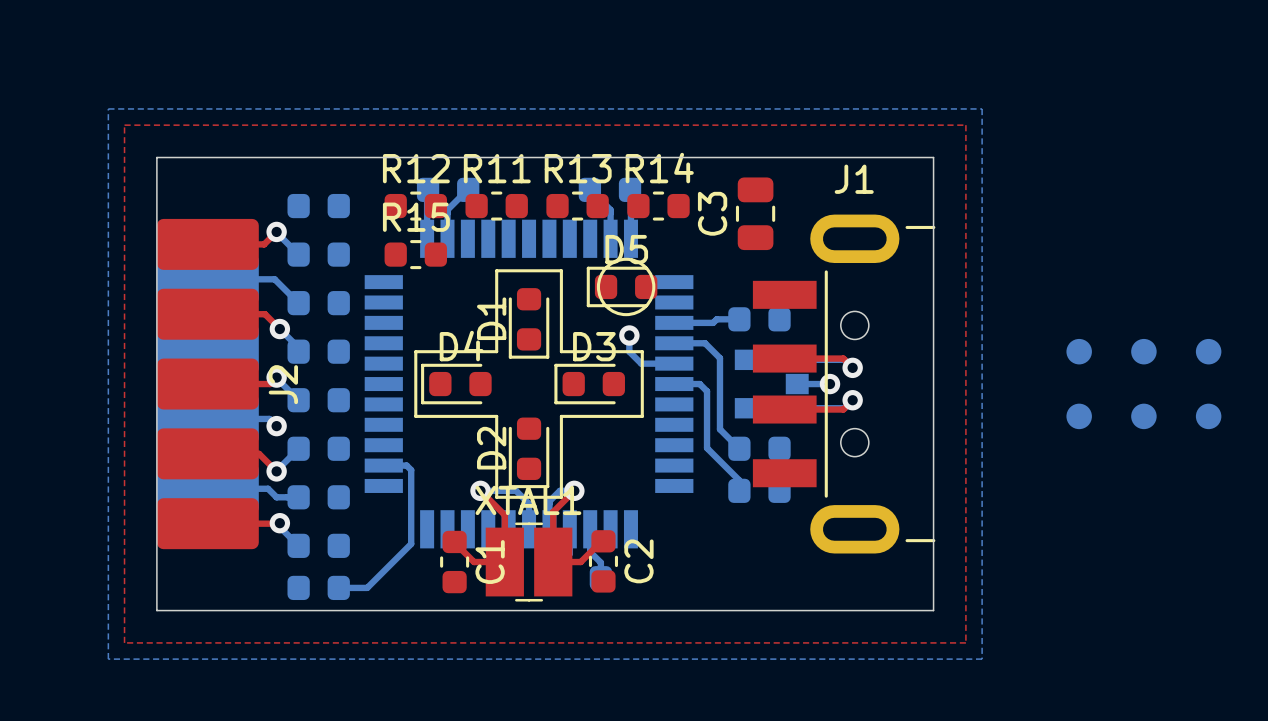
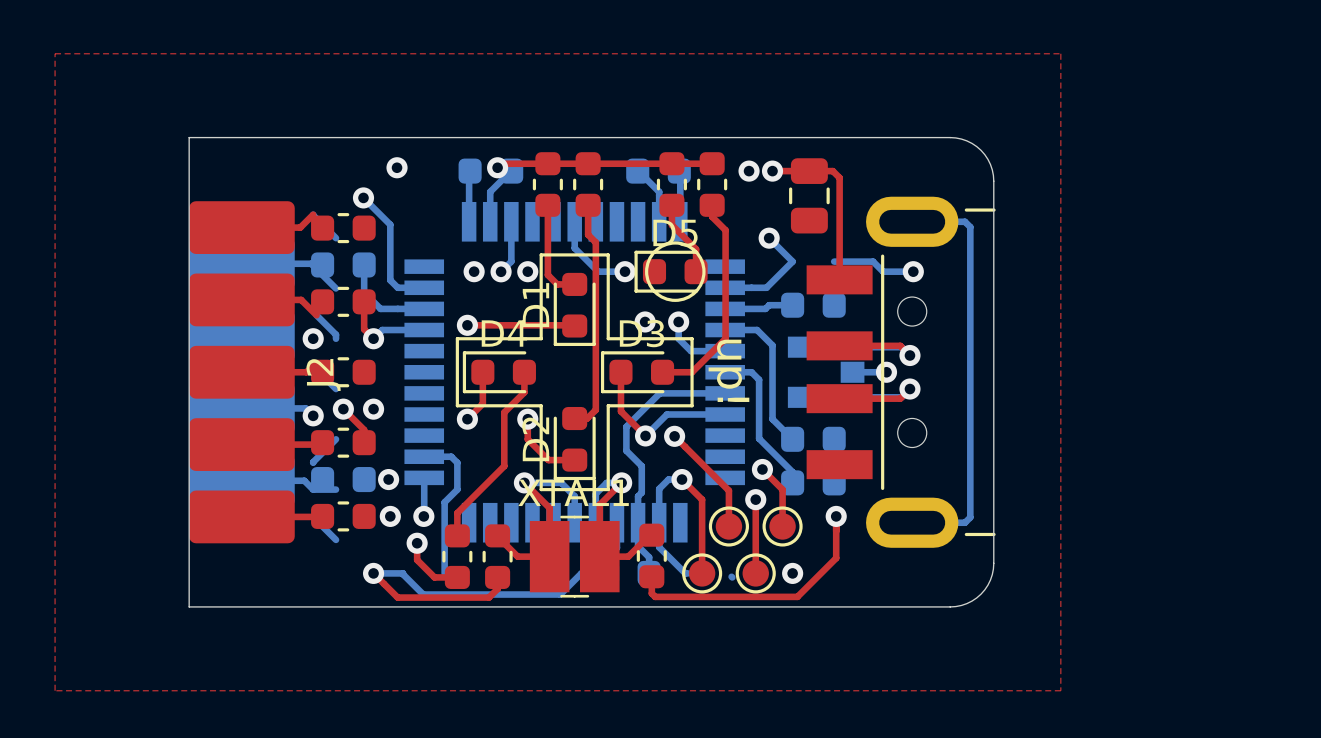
bottom zone outline: (108, 108) (108, 659) (982, 659) (982, 108) (108, 108) -> none
top zone outline: (124, 125) (124, 642) (965, 642) (965, 125) (124, 125) -> (55, 53) (55, 690) (1060, 690) (1060, 53) (55, 53)
board edge: (891, 157) (933, 157) (933, 199) -> (950, 137) (966, 140) (981, 150) (990, 164) (993, 181)
J1 name: J1 (854, 179) -> none
top track: none -> (712, 163) (501, 163) (497, 167)
via: none -> (397, 167)
via: none -> (497, 167)
via: none -> (749, 171)
top track: none -> (772, 171) (832, 171) (839, 177) (839, 279)
via: none -> (772, 171)
part: none -> (547, 184)
part: none -> (588, 184)
part: none -> (671, 184)
part: none -> (712, 184)
part: (318, 206) -> none
R12: (415, 206) -> none
R11: (496, 206) -> none
R13: (577, 206) -> none
R14: (658, 206) -> none
C3 name: C3 (712, 213) -> none
bottom track: none -> (363, 197) (390, 224) (390, 280) (397, 287) (424, 287)
via: none -> (363, 197)
top track: none -> (547, 205) (547, 275) (557, 284) (574, 284)
top track: none -> (671, 205) (671, 225) (696, 249) (696, 271)
top track: none -> (712, 205) (712, 216) (725, 230) (725, 338) (692, 372) (662, 372)
top track: none -> (588, 205) (588, 234) (595, 242) (595, 409) (587, 418) (574, 418)
via: (276, 231) -> none
bottom track: none -> (511, 221) (511, 261) (501, 271)
bottom track: none -> (574, 221) (574, 248) (598, 271) (625, 271)
bottom track: none -> (912, 221) (965, 221) (970, 227) (970, 517) (965, 522) (912, 522)
part side: bottom (318, 254) -> top (343, 228)
R15: (415, 254) -> none
bottom track: none -> (769, 238) (792, 261) (766, 287) (725, 287)
via: none -> (769, 238)
bottom track: none -> (834, 261) (873, 261) (883, 271) (913, 271)
bottom track: none -> (364, 264) (364, 292) (380, 308) (424, 308)
via: none -> (474, 271)
via: none -> (527, 271)
via: none -> (625, 271)
via: none -> (913, 271)
via: none -> (501, 271)
part position: (318, 303) -> (343, 264)
top track: none -> (364, 301) (364, 329) (373, 338)
via: (279, 329) -> none
via: none -> (645, 321)
top track: none -> (467, 325) (574, 325)
via: none -> (467, 325)
bottom track: none -> (424, 330) (382, 330) (373, 338)
via: none -> (313, 338)
part side: bottom (318, 351) -> top (343, 301)
via: none -> (373, 338)
part side: bottom (1079, 351) -> top (755, 573)
part side: bottom (1143, 351) -> top (728, 526)
part side: bottom (1208, 351) -> top (782, 526)
via: (276, 377) -> none
top track: none -> (482, 372) (482, 403) (467, 419)
top track: none -> (524, 372) (524, 392) (504, 412) (504, 466) (457, 513) (457, 535)
top track: none -> (620, 372) (620, 411) (645, 435)
text: none -> up! (728, 370)
part side: bottom (318, 400) -> top (343, 372)
bottom track: none -> (725, 393) (659, 393) (626, 426) (626, 450) (641, 466) (641, 492) (638, 496) (638, 522)
part side: bottom (1079, 416) -> top (702, 573)
part: (1143, 416) -> none
part: (1208, 416) -> none
top track: none -> (343, 409) (364, 429) (364, 442)
via: none -> (343, 409)
via: none -> (373, 409)
bottom track: none -> (725, 414) (667, 414) (645, 435)
via: none -> (467, 419)
top track: none -> (527, 419) (527, 439) (548, 460) (574, 460)
via: none -> (527, 419)
via: none -> (645, 435)
top track: none -> (674, 436) (728, 490) (728, 526)
via: none -> (674, 436)
part side: bottom (318, 448) -> top (343, 442)
top track: (259, 453) (276, 471) -> (295, 444) (320, 444) (322, 442)
bottom track: (406, 465) (411, 470) (411, 543) (367, 587) (338, 587) -> (447, 456) (451, 456) (457, 462) (457, 489) (444, 502) (444, 573)
via: (276, 471) -> none
top track: none -> (762, 469) (782, 489) (782, 526)
via: none -> (762, 469)
bottom track: none -> (424, 477) (423, 516)
via: none -> (388, 479)
top track: none -> (681, 479) (702, 499) (702, 573)
bottom track: none -> (681, 479) (668, 479) (659, 488) (659, 547) (685, 573) (688, 573)
via: none -> (681, 479)
part position: (318, 497) -> (343, 479)
top track: none -> (755, 499) (755, 573)
via: none -> (755, 499)
via: (279, 523) -> none
via: none -> (390, 516)
via: none -> (423, 516)
top track: none -> (836, 516) (836, 558) (797, 596) (655, 596) (651, 593) (651, 577)
via: none -> (836, 516)
part side: bottom (318, 545) -> top (343, 516)
top track: none -> (417, 543) (417, 560) (434, 577) (457, 577)
via: none -> (417, 543)
C2 name: C2 (638, 561) -> none
part: none -> (457, 556)
C1 name: C1 (490, 562) -> none
board edge: (933, 568) (933, 610) (891, 610) -> (993, 563) (990, 580) (981, 594) (966, 603) (950, 606)
top track: none -> (373, 573) (397, 597) (489, 597) (497, 588) (497, 577)
bottom track: none -> (373, 573) (403, 573) (423, 594) (560, 594) (581, 573) (607, 573)
via: none -> (373, 573)
via: none -> (792, 573)
bottom track: none -> (731, 576) (732, 577)
part: (318, 587) -> none

